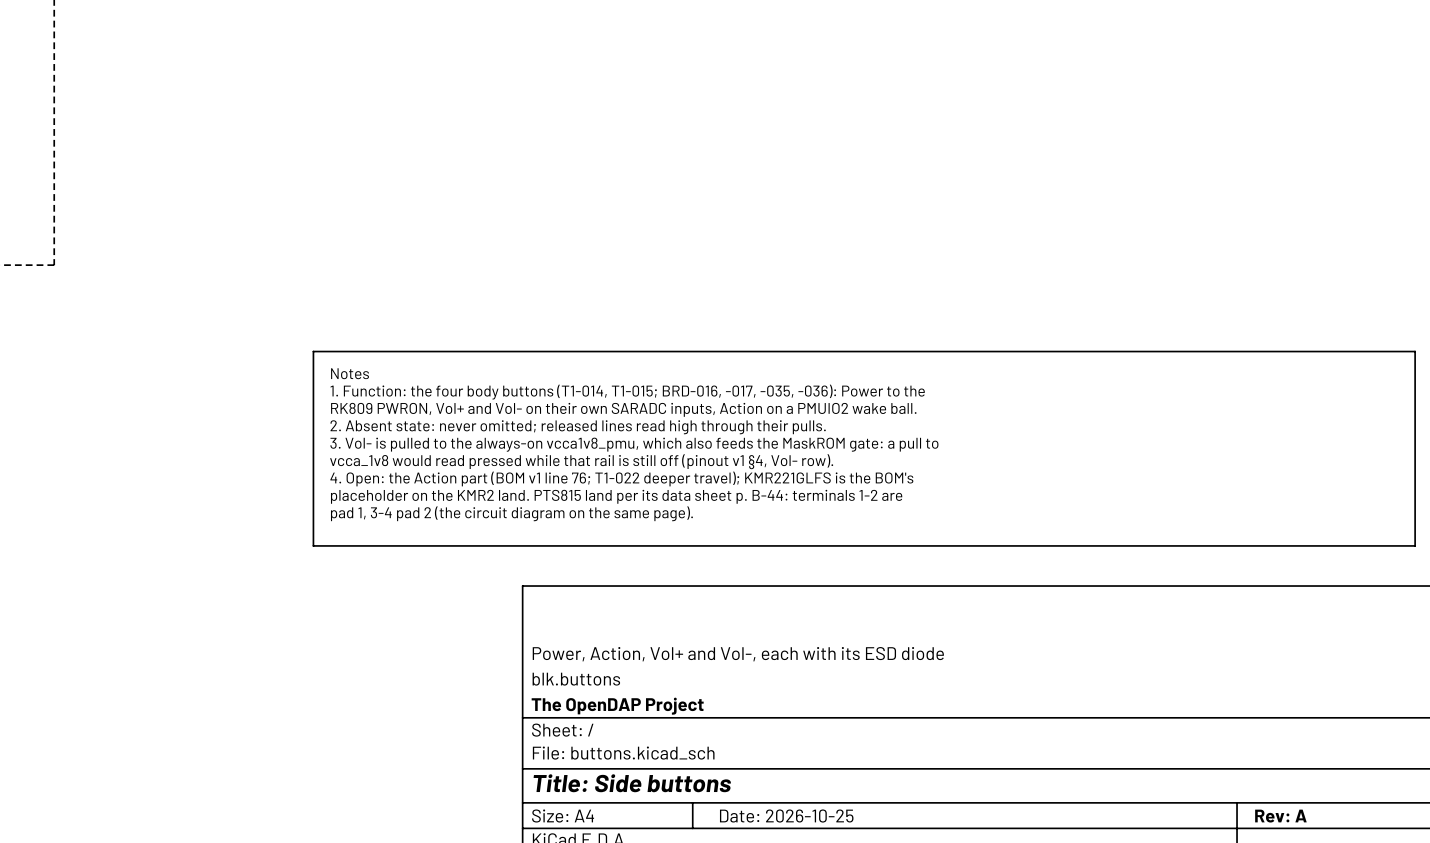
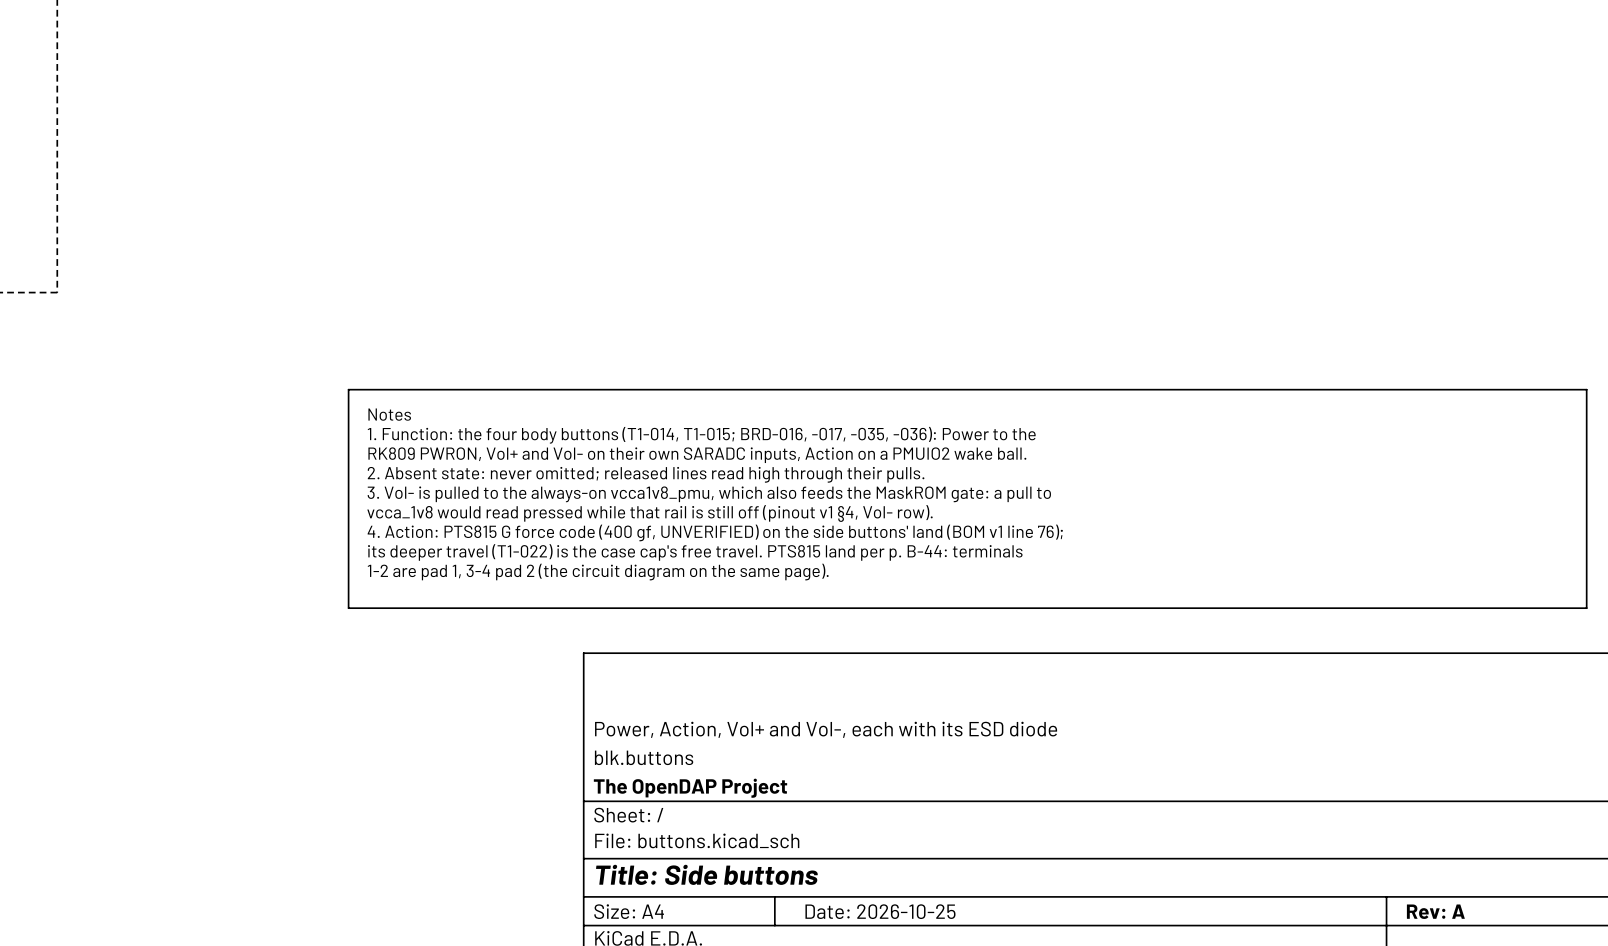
text: 4. Open: the Action part (BOM v1 line 76; T1-022 deeper travel); KMR221GLFS is the BOM's (621, 479) -> 4. Action: PTS815 G force code (400 gf, UNVERIFIED) on the side buttons' land (BOM v1 line 76); (715, 532)
text: placeholder on the KMR2 land. PTS815 land per its data sheet p. B-44: terminals 1-2 are (616, 496) -> its deeper travel (T1-022) is the case cap's free travel. PTS815 land per p. B-44: terminals (695, 552)
text: pad 1, 3-4 pad 2 (the circuit diagram on the same page). (511, 513) -> 1-2 are pad 1, 3-4 pad 2 (the circuit diagram on the same page). (598, 572)

